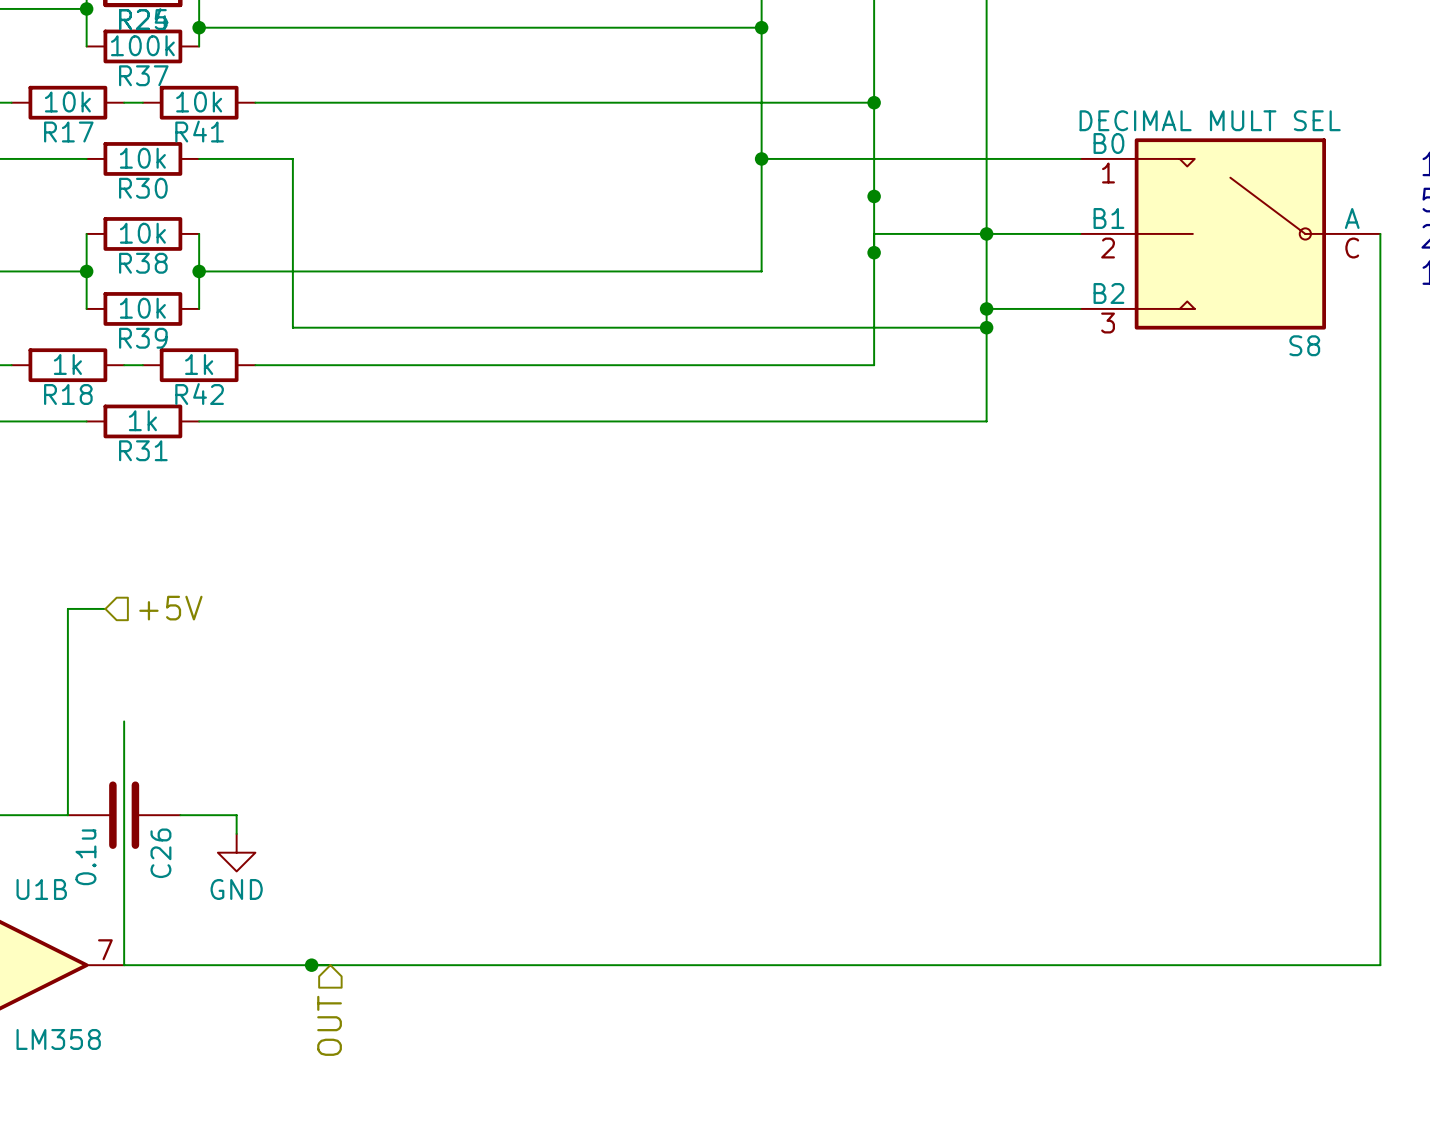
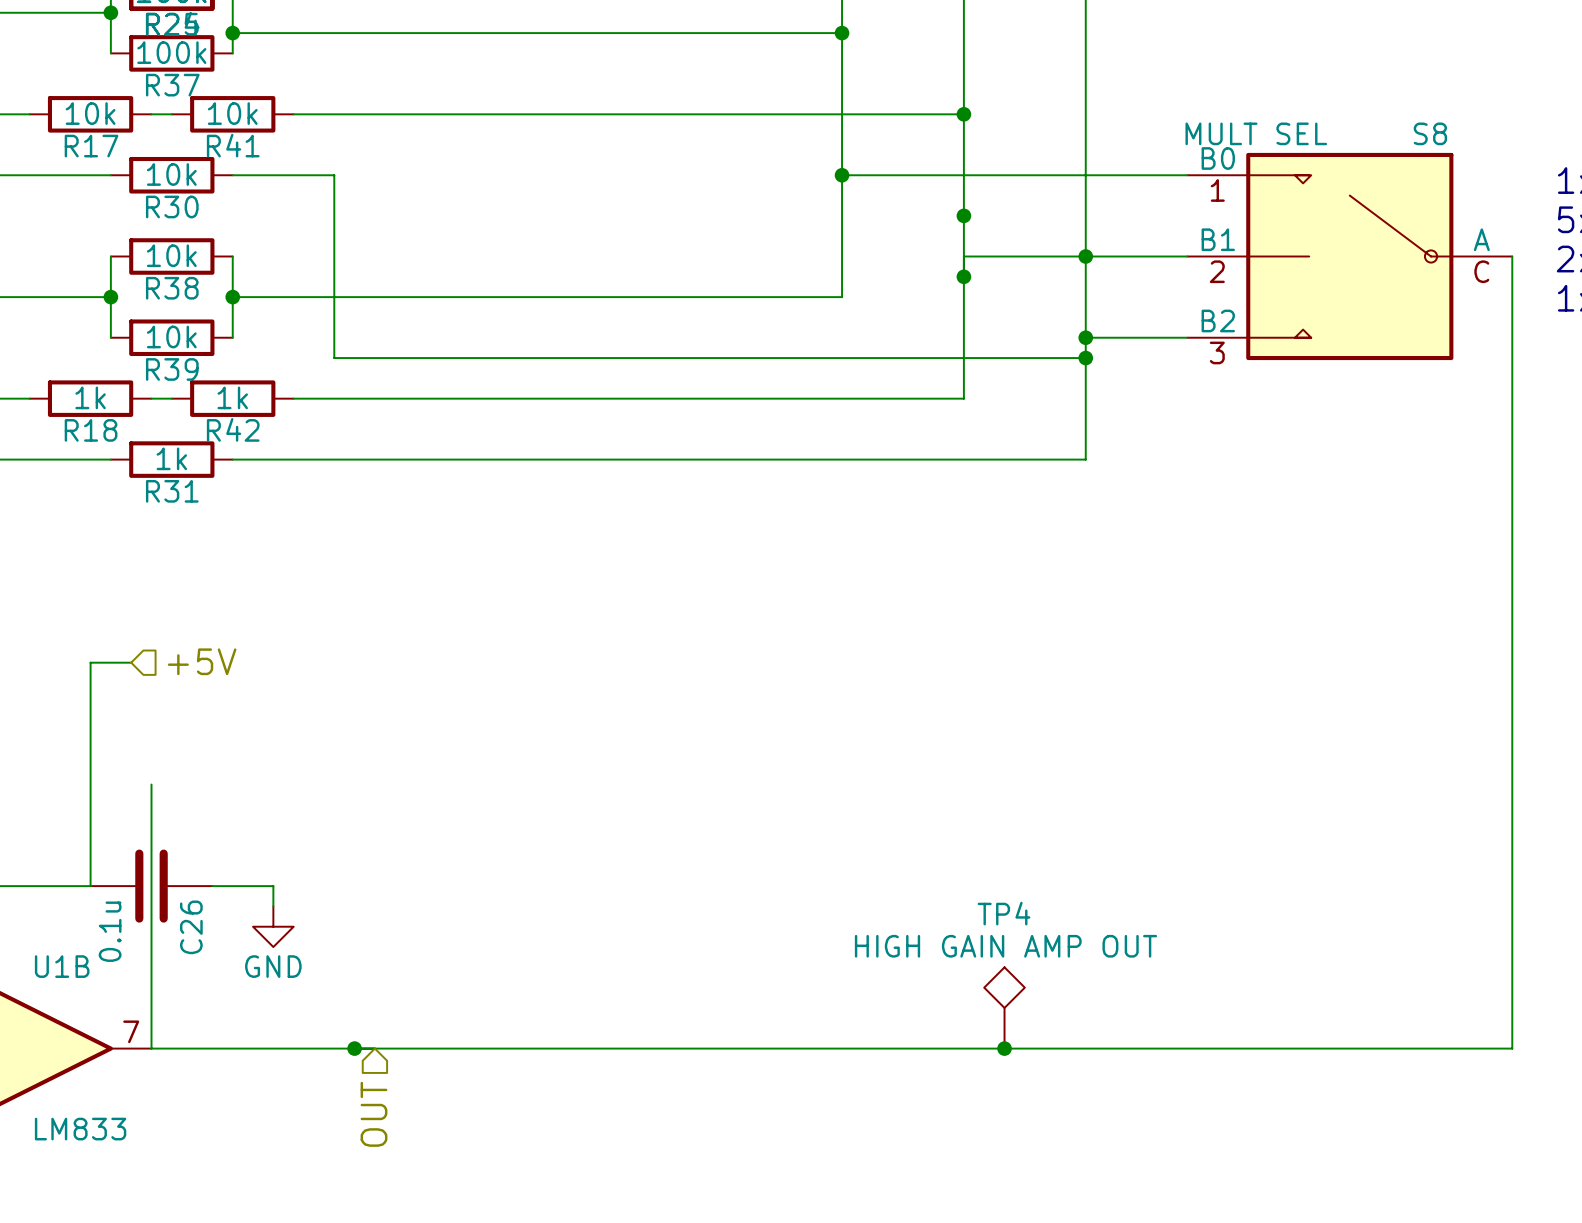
S8 value: DECIMAL MULT SEL (1210, 120) -> MULT SEL (1256, 133)
S8 name position: S8 (1304, 345) -> S8 (1430, 133)
TP4: none -> HIGH GAIN AMP OUT (1004, 1007)
junction: none -> (1004, 1048)
U1B value: LM358 (58, 1039) -> LM833 (80, 1129)

